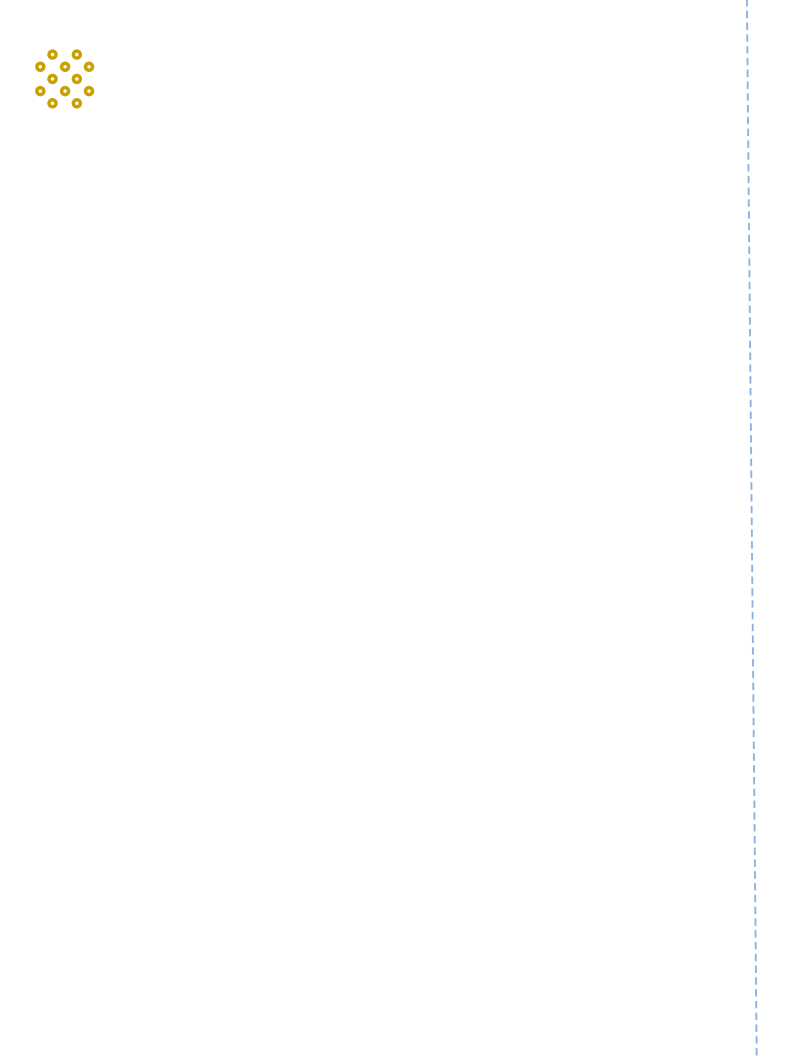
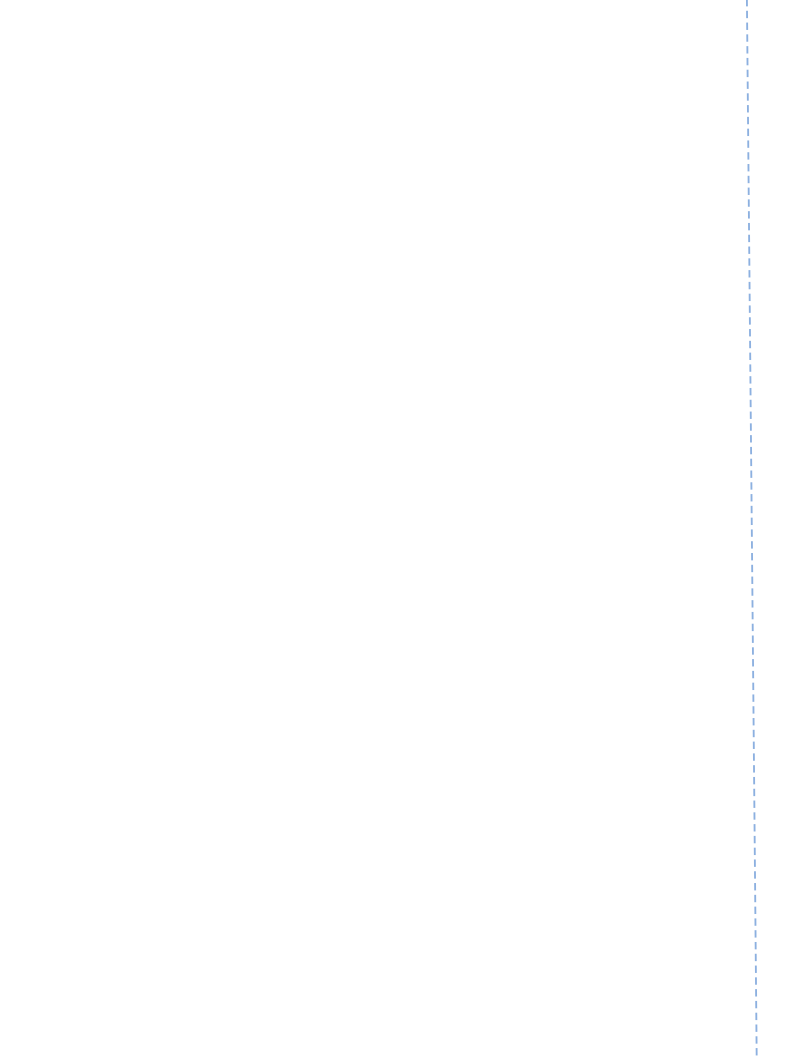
part: (64, 78) -> none

